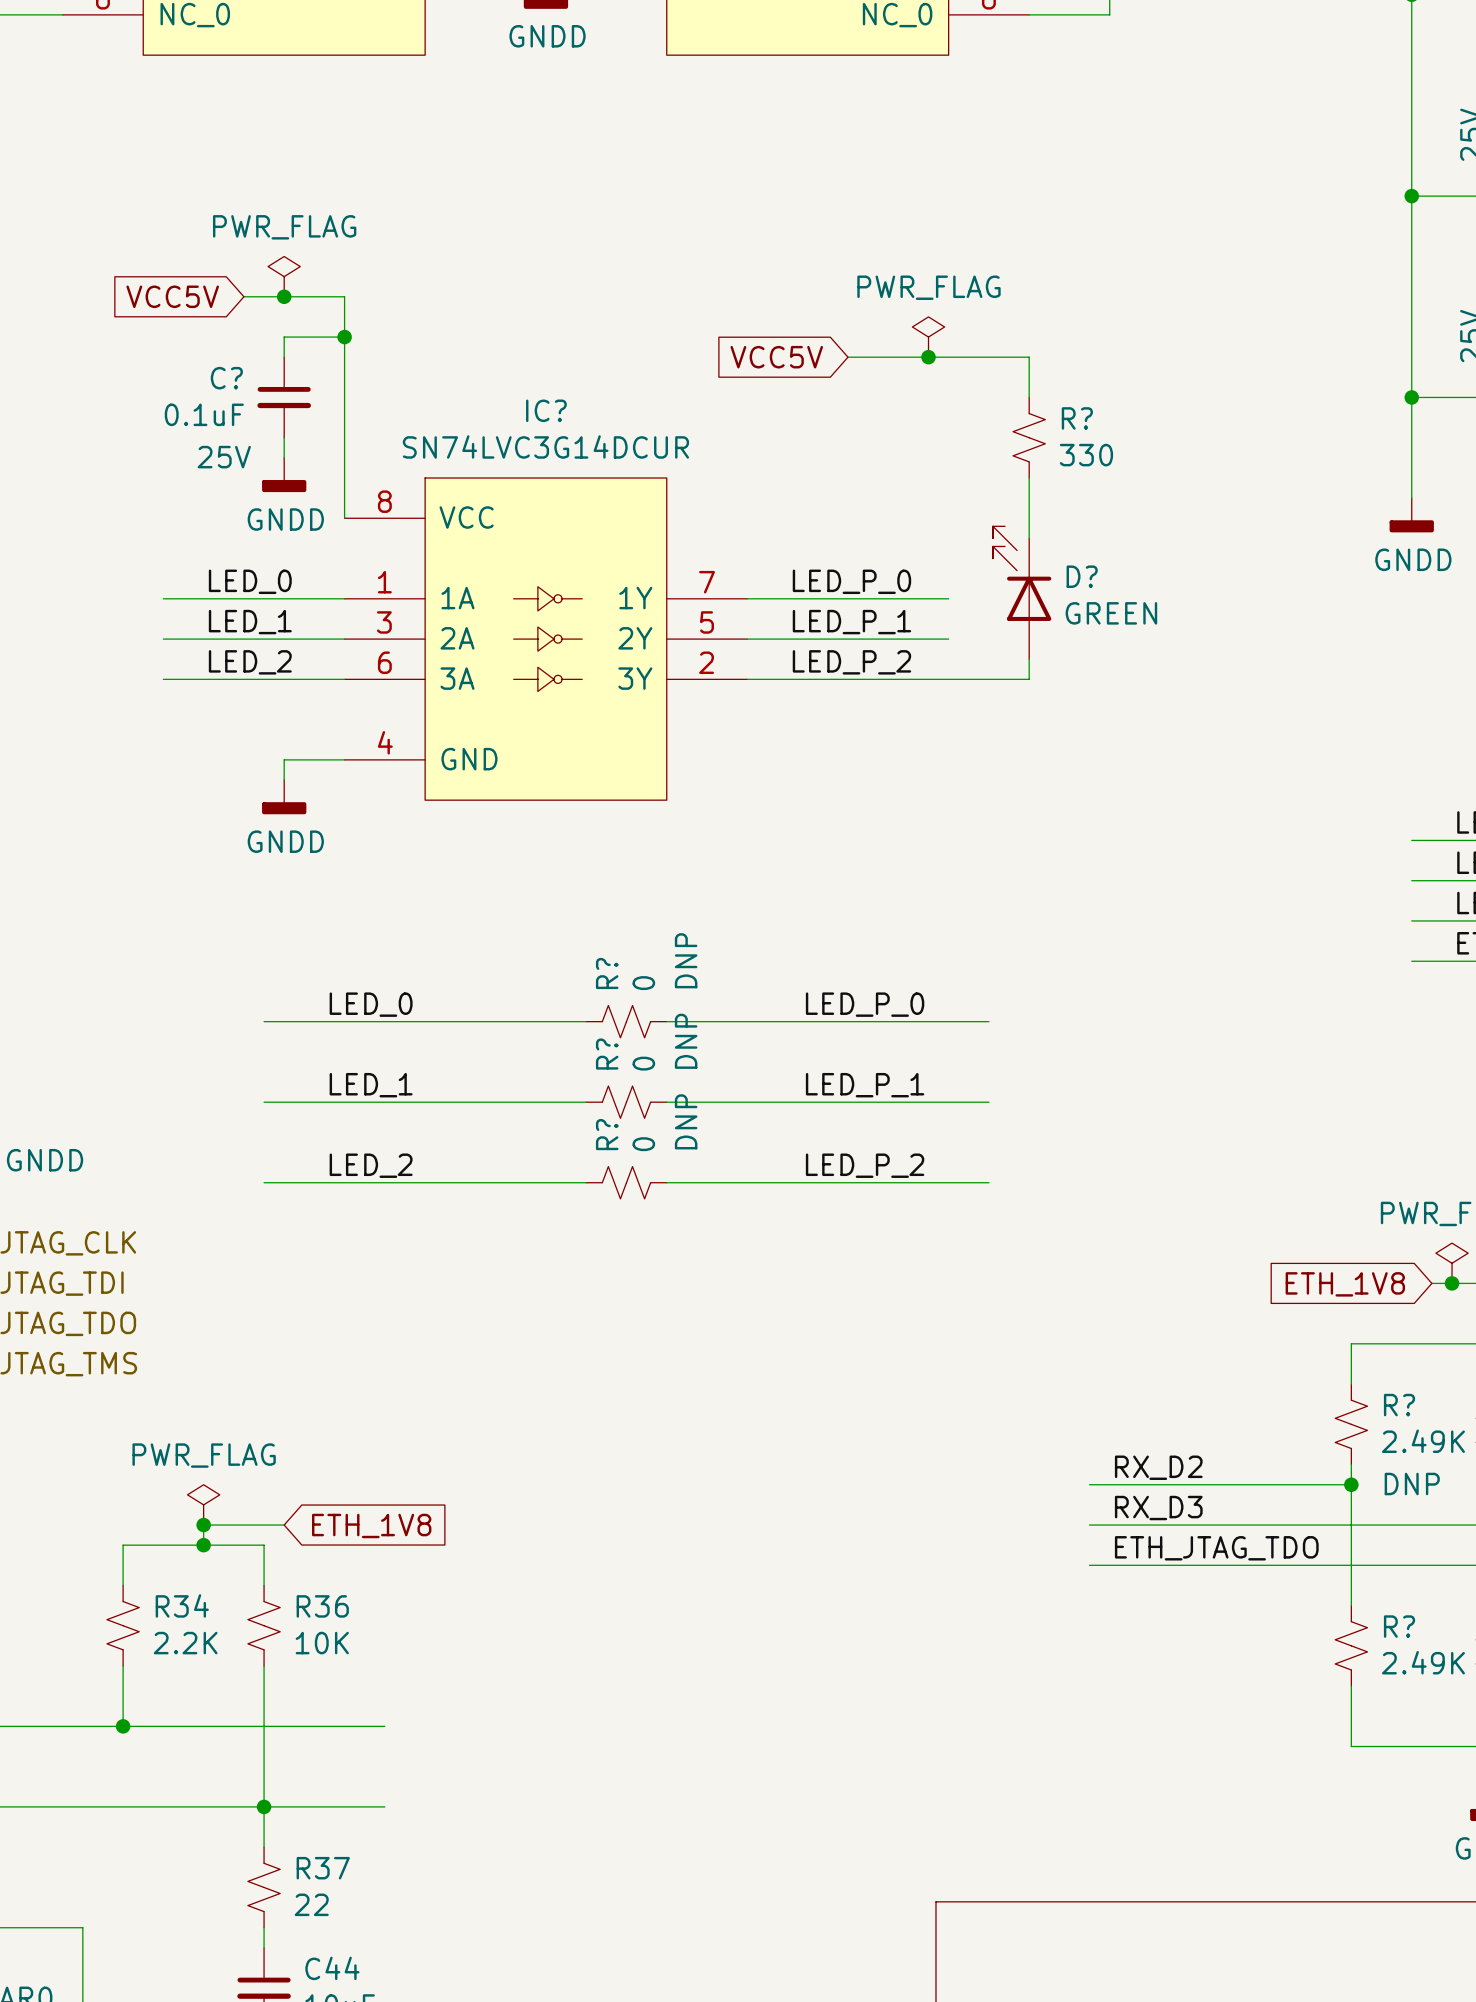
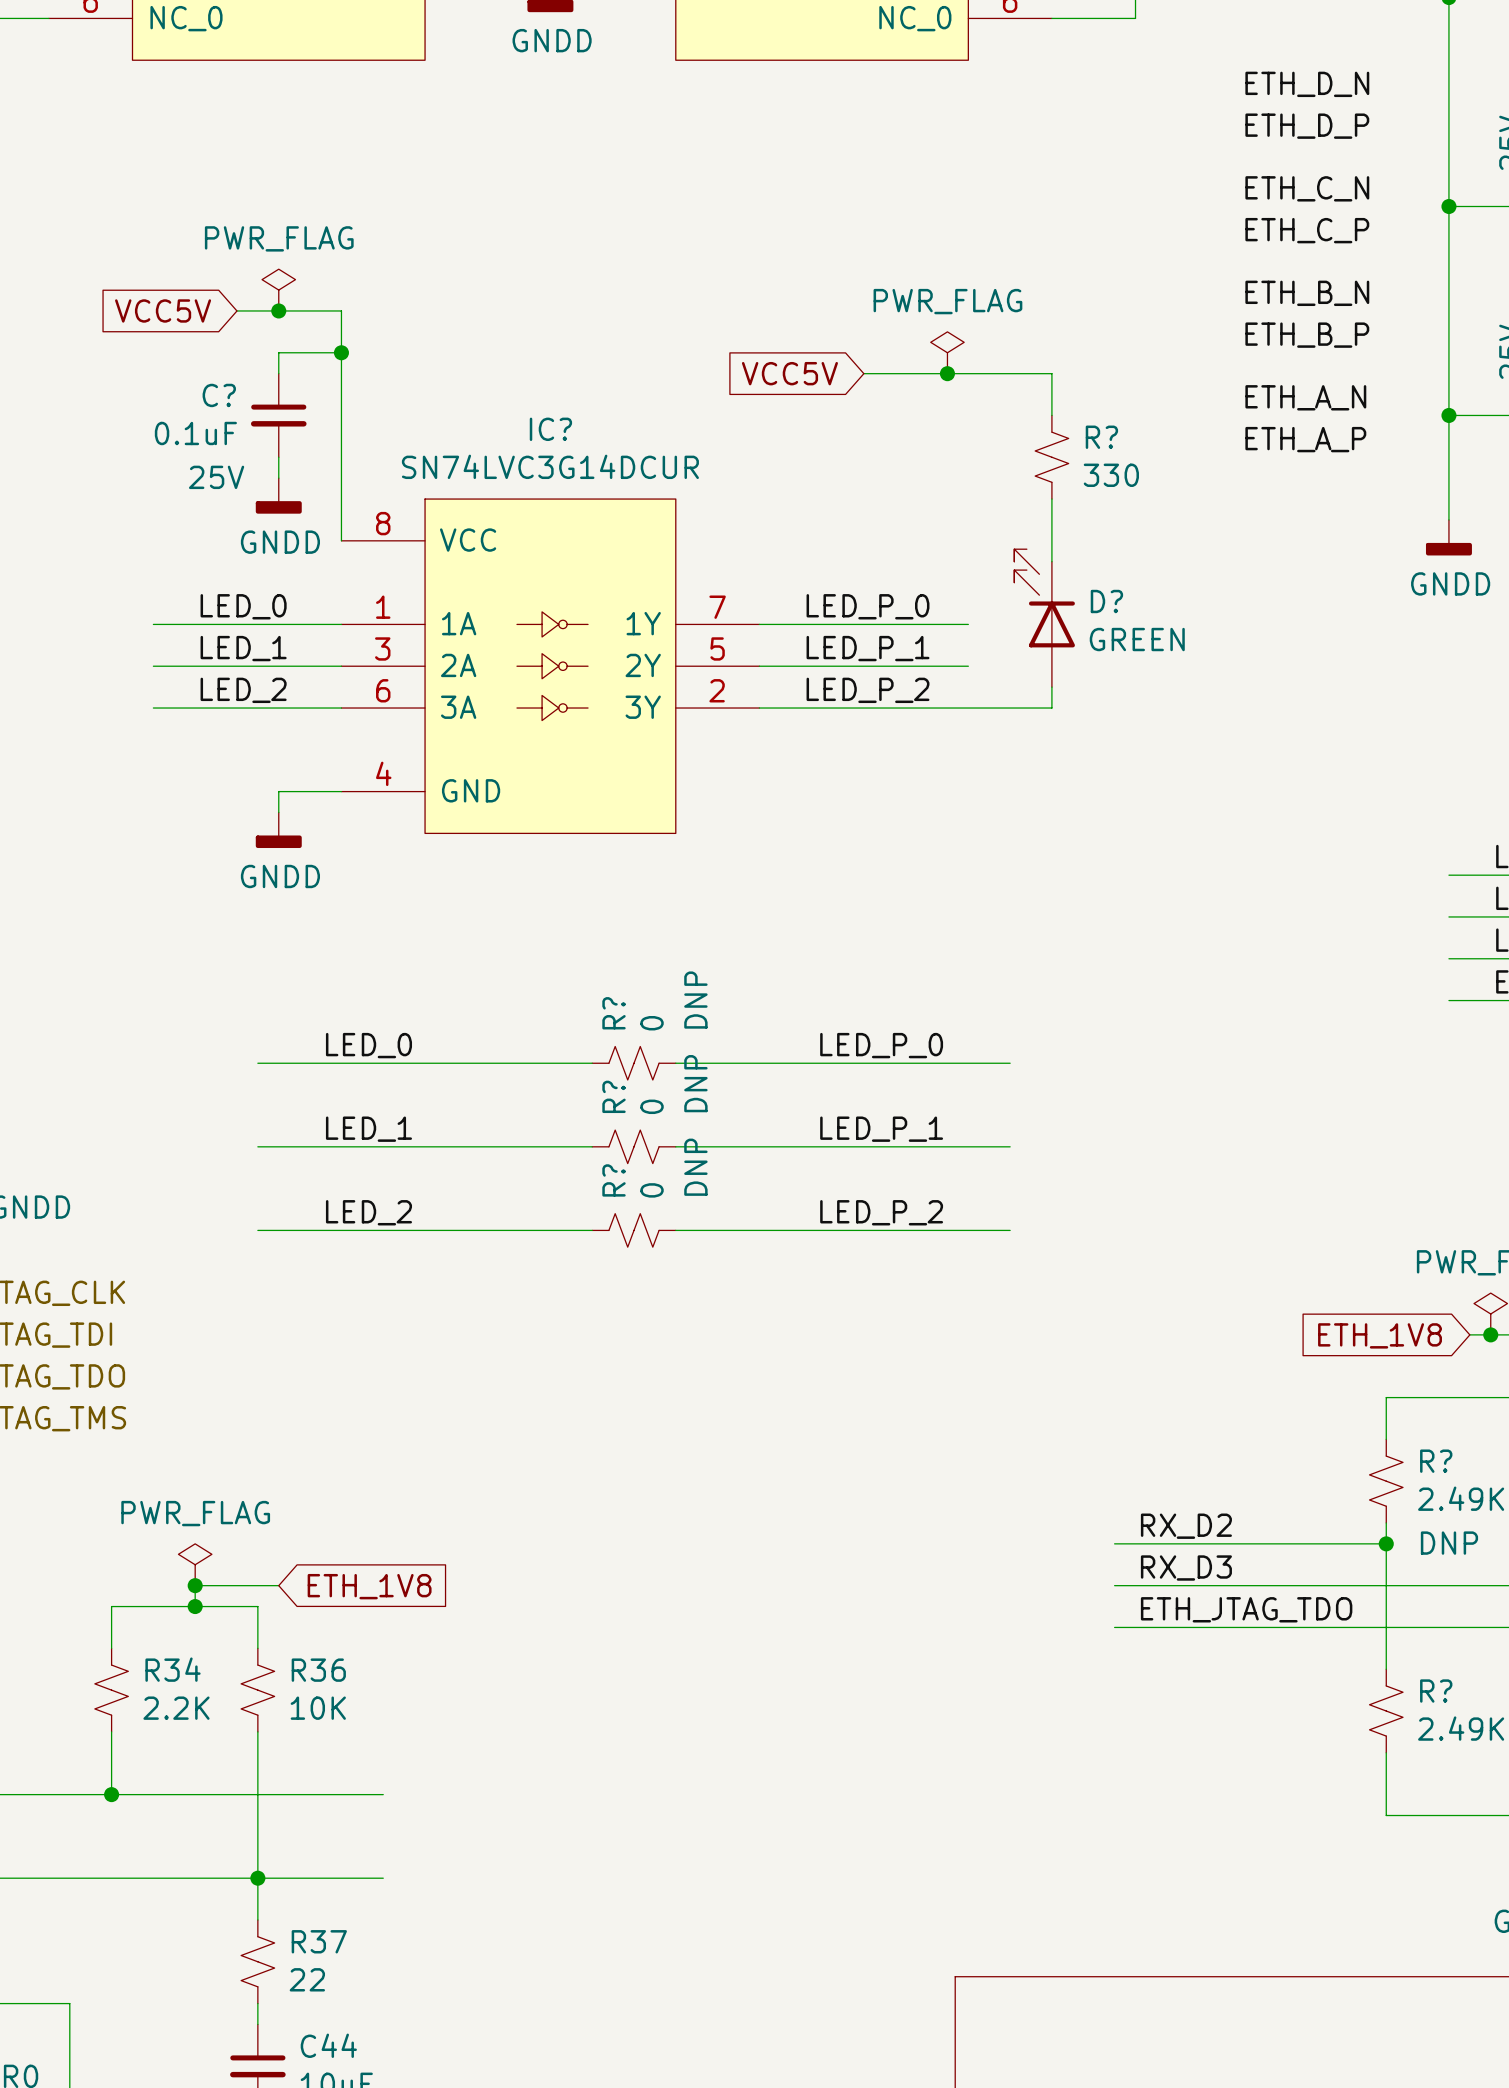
label: none -> ETH_D_N (1307, 84)
label: none -> ETH_D_P (1307, 126)
label: none -> ETH_C_N (1307, 188)
label: none -> ETH_C_P (1307, 230)
label: none -> ETH_B_N (1307, 293)
label: none -> ETH_B_P (1307, 335)
label: none -> ETH_A_N (1305, 397)
label: none -> ETH_A_P (1305, 439)

